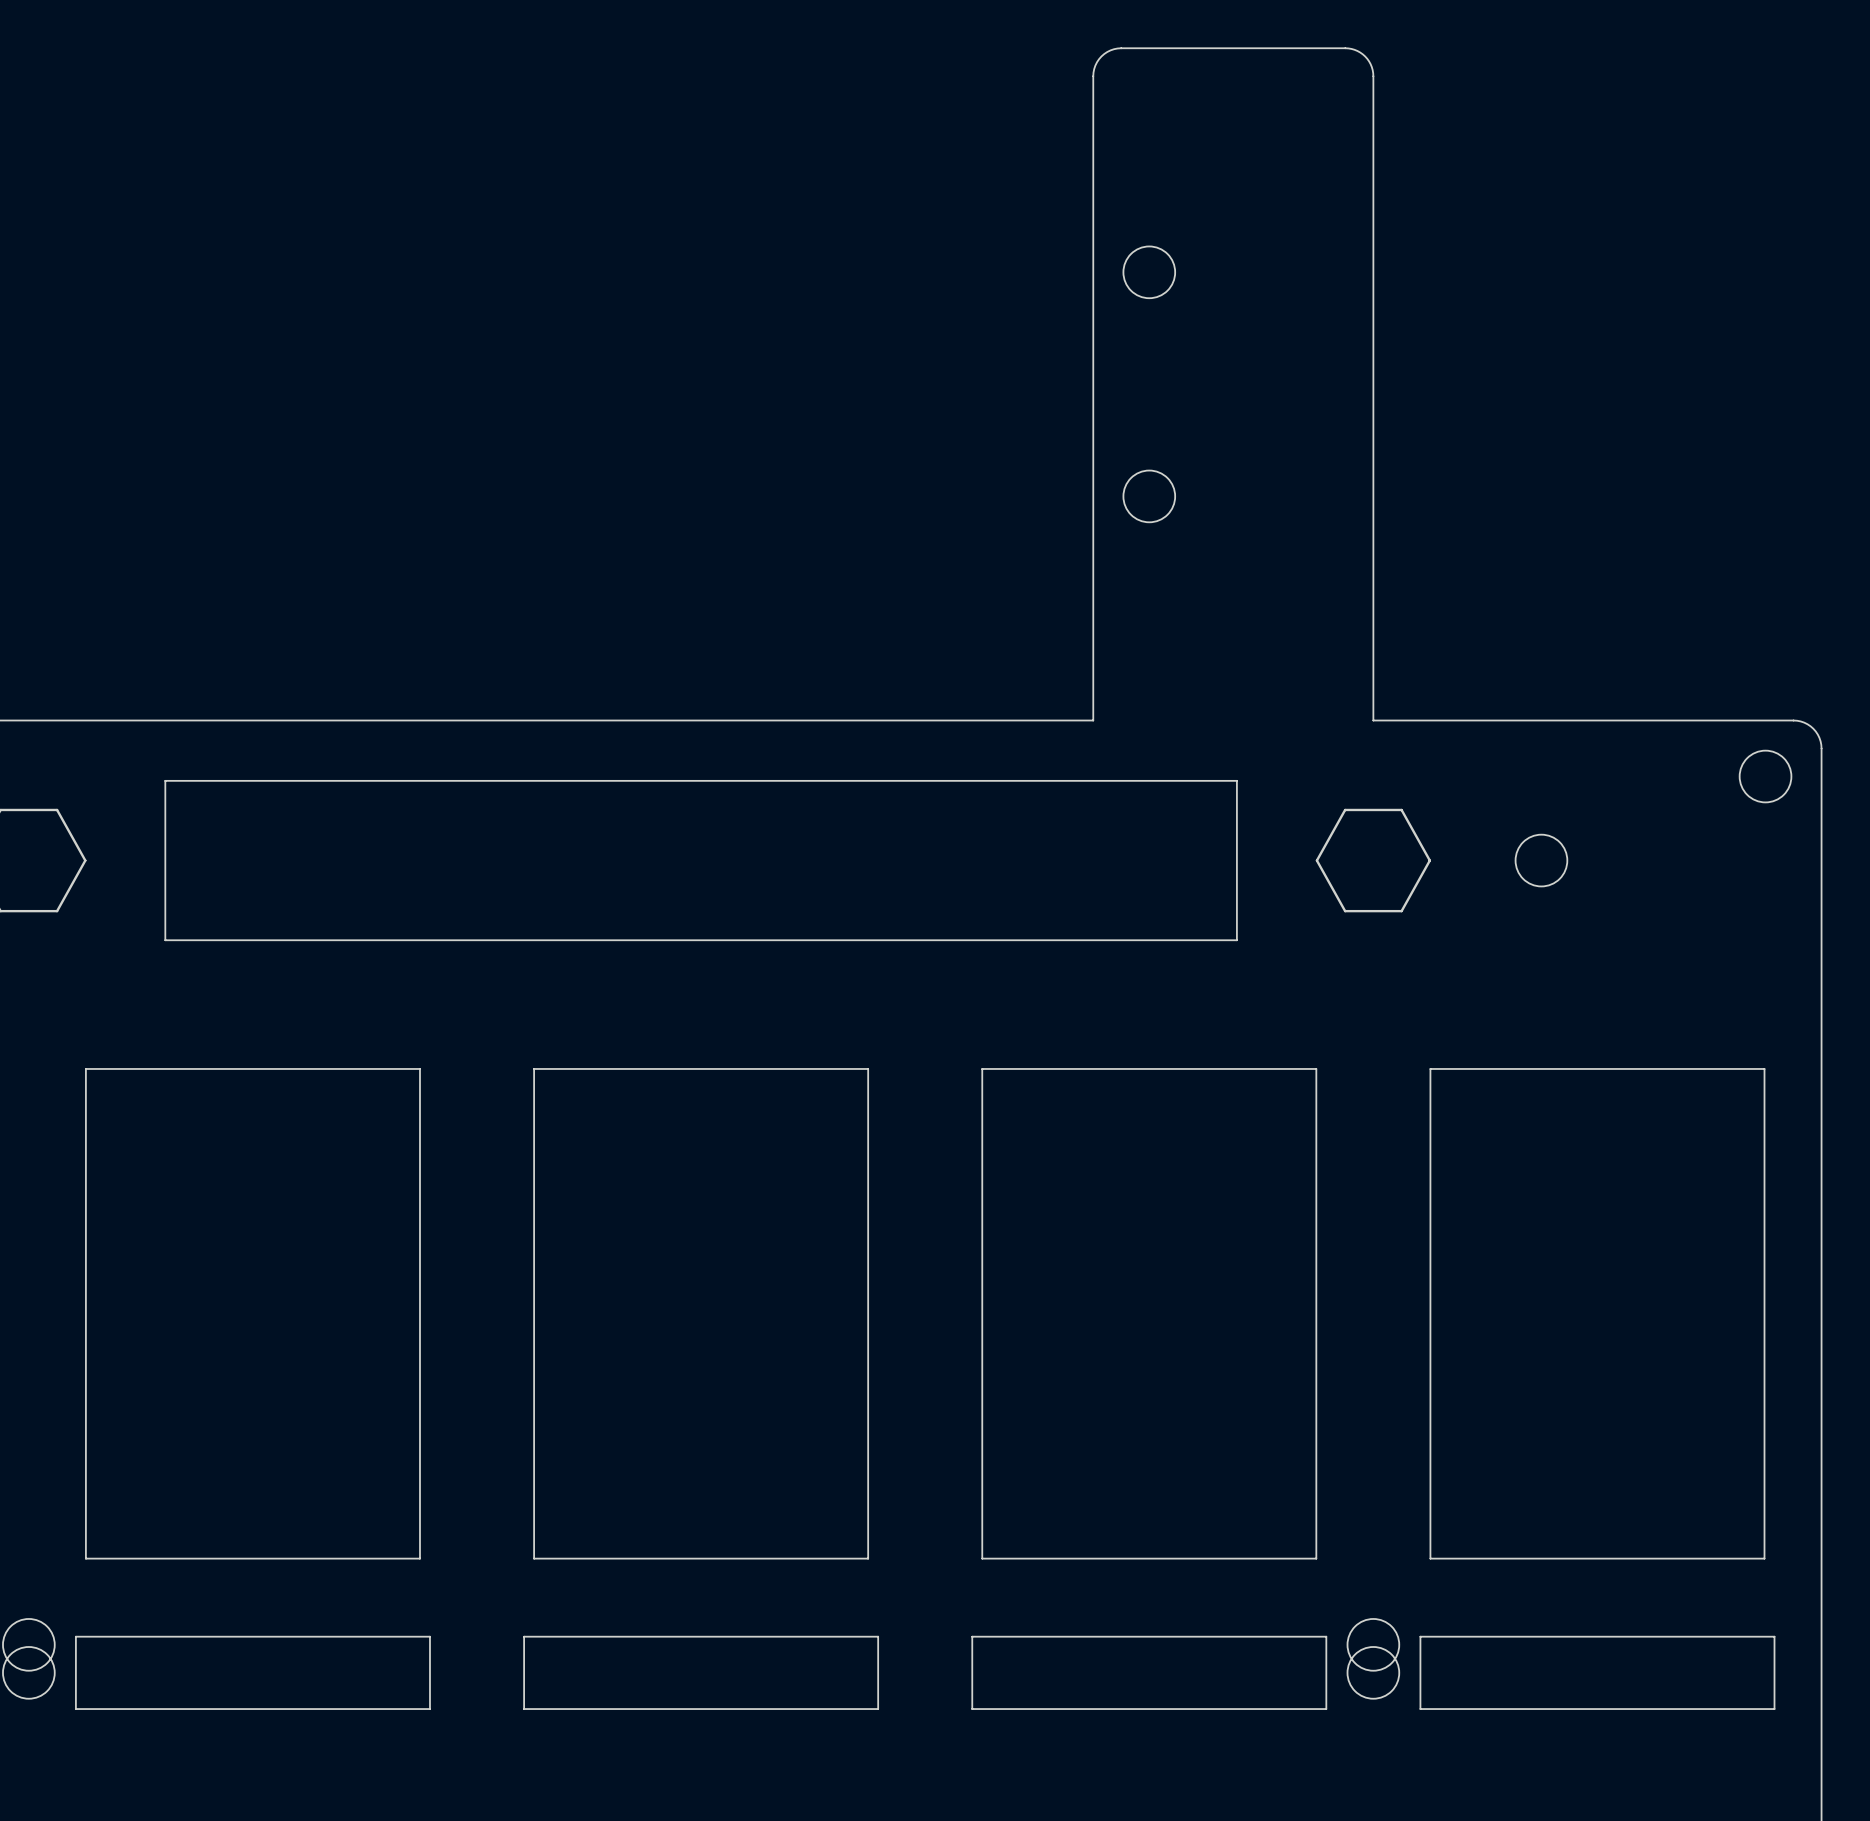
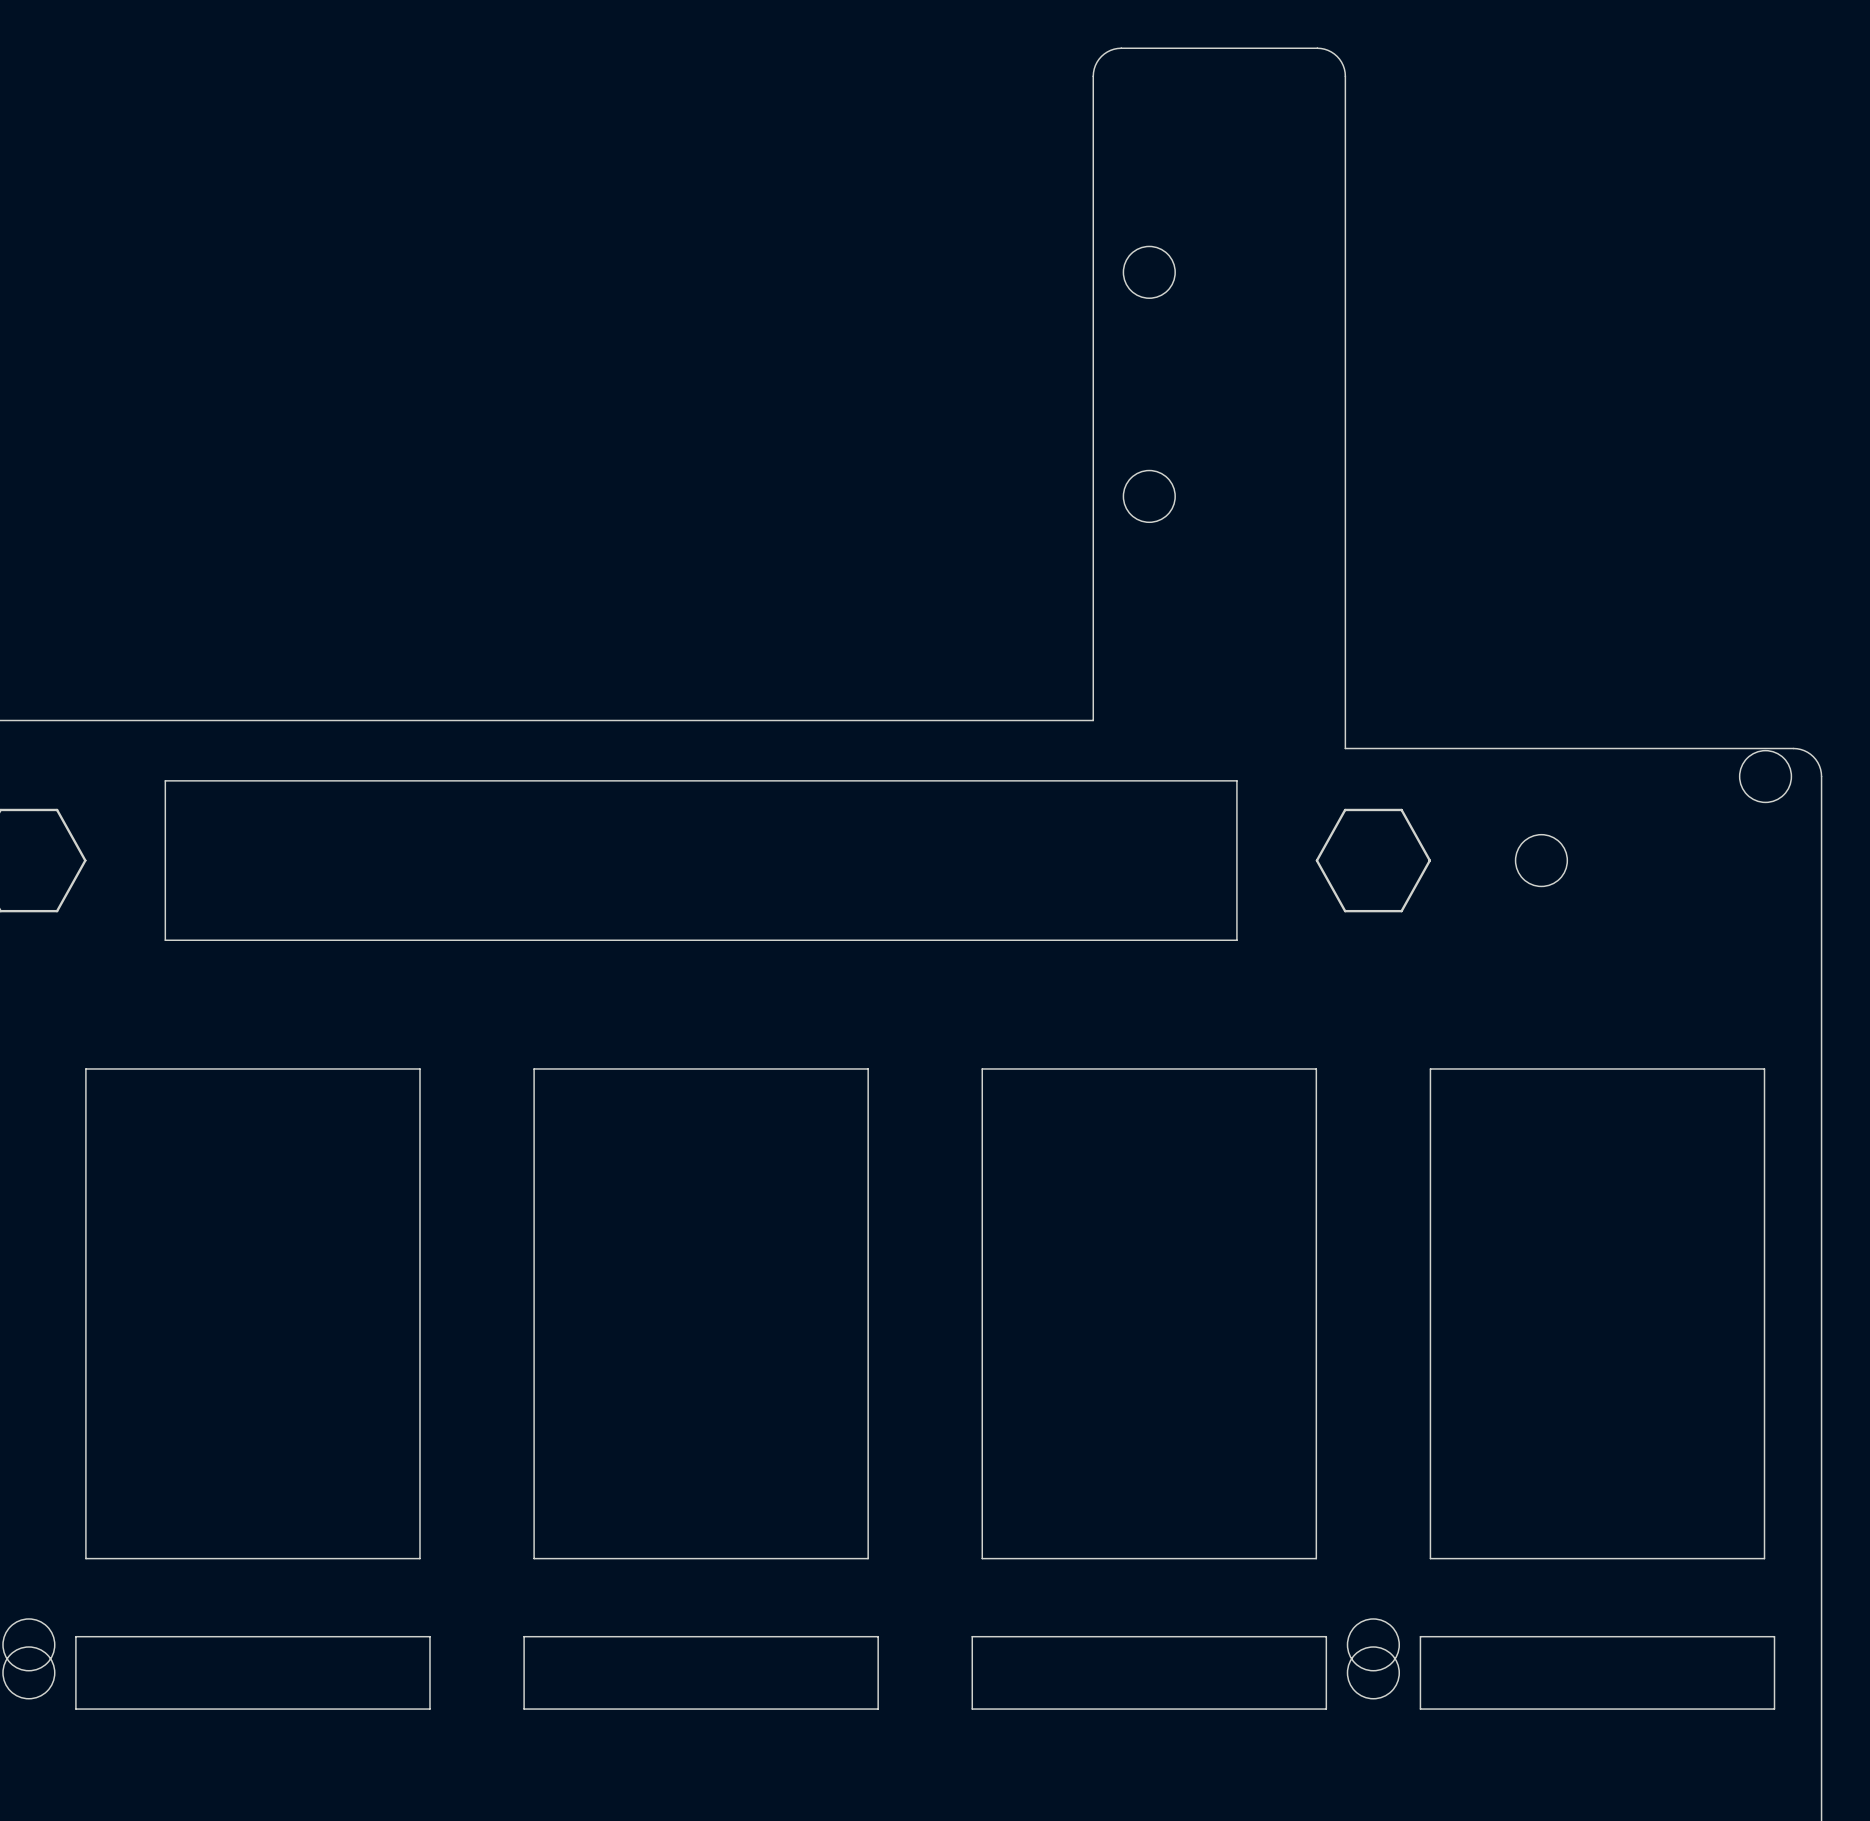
board edge: (1317, 48) (1348, 48) (1357, 51) (1369, 61) (1373, 73) (1373, 720) (1797, 720) (1810, 726) (1819, 737) (1821, 748) (1821, 776) -> (1317, 48) (1328, 50) (1337, 56) (1343, 65) (1345, 76) (1345, 748) (1793, 748) (1804, 750) (1813, 756) (1819, 765) (1821, 776)

